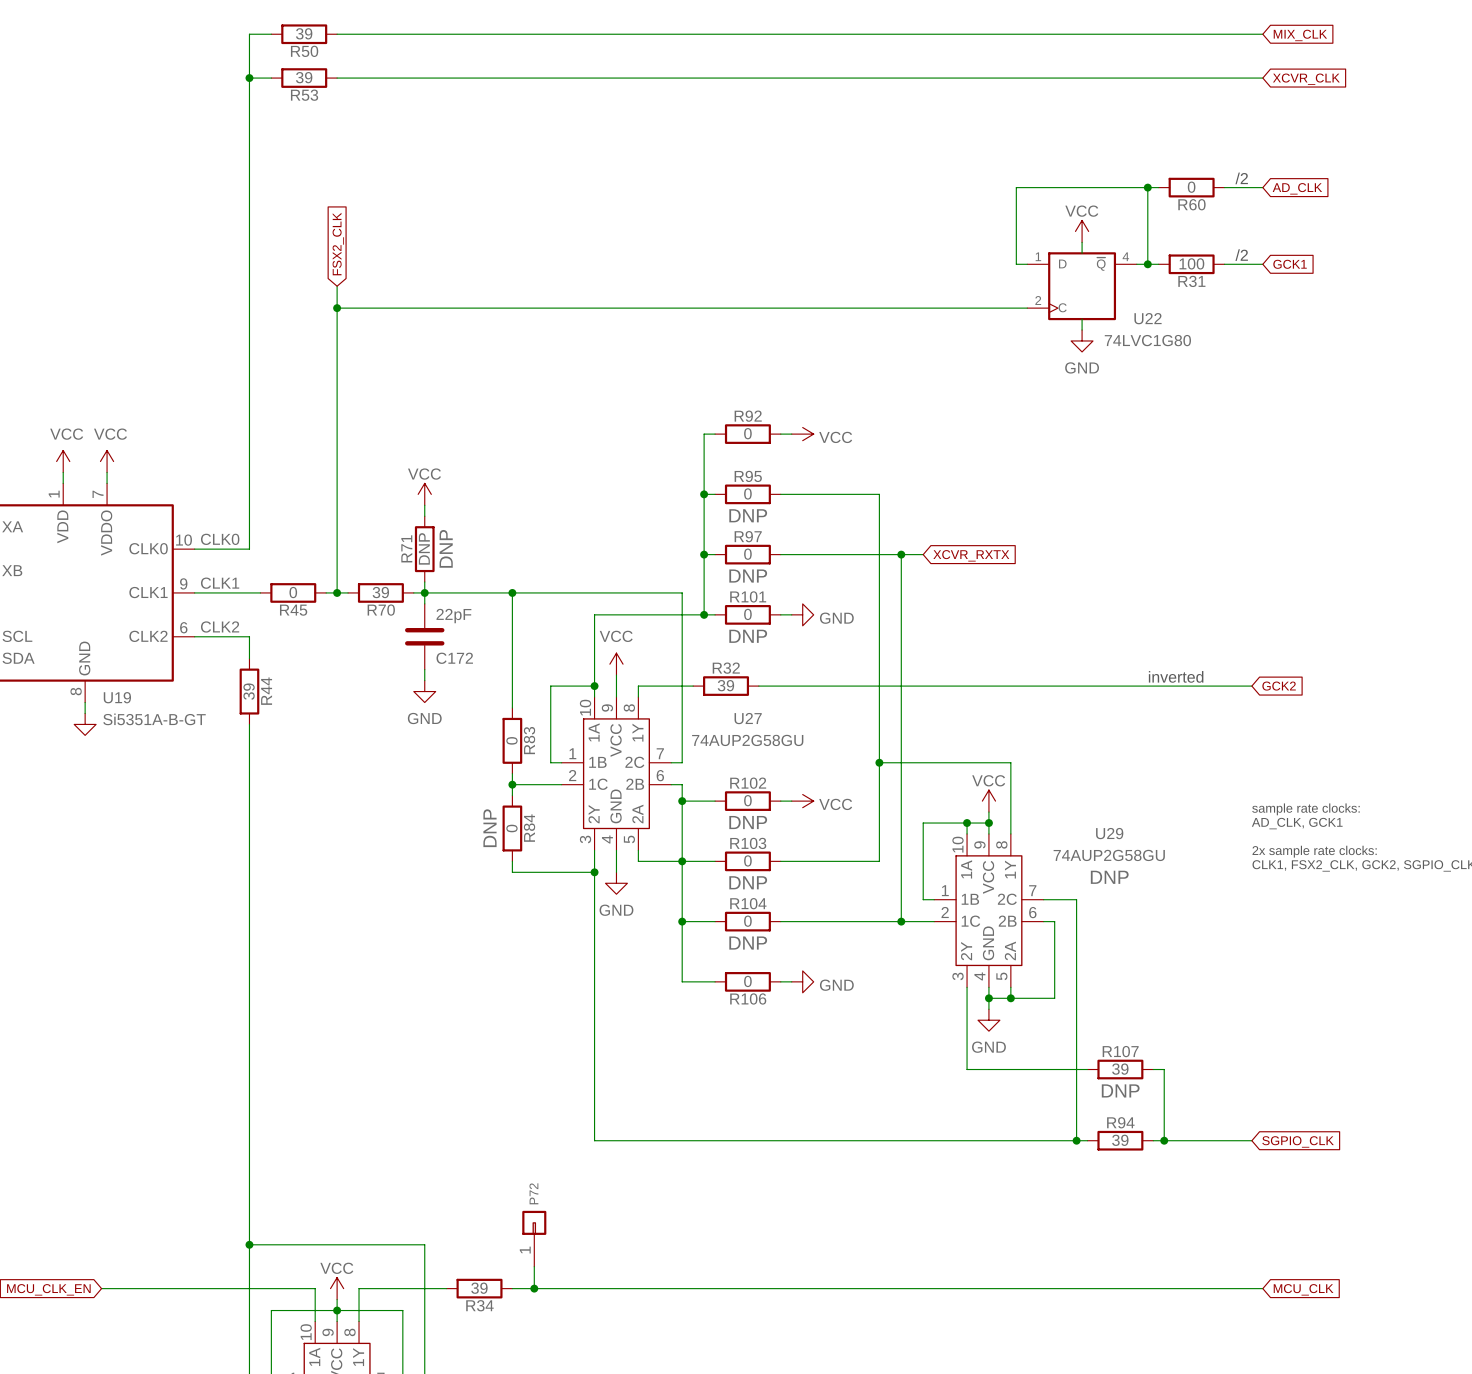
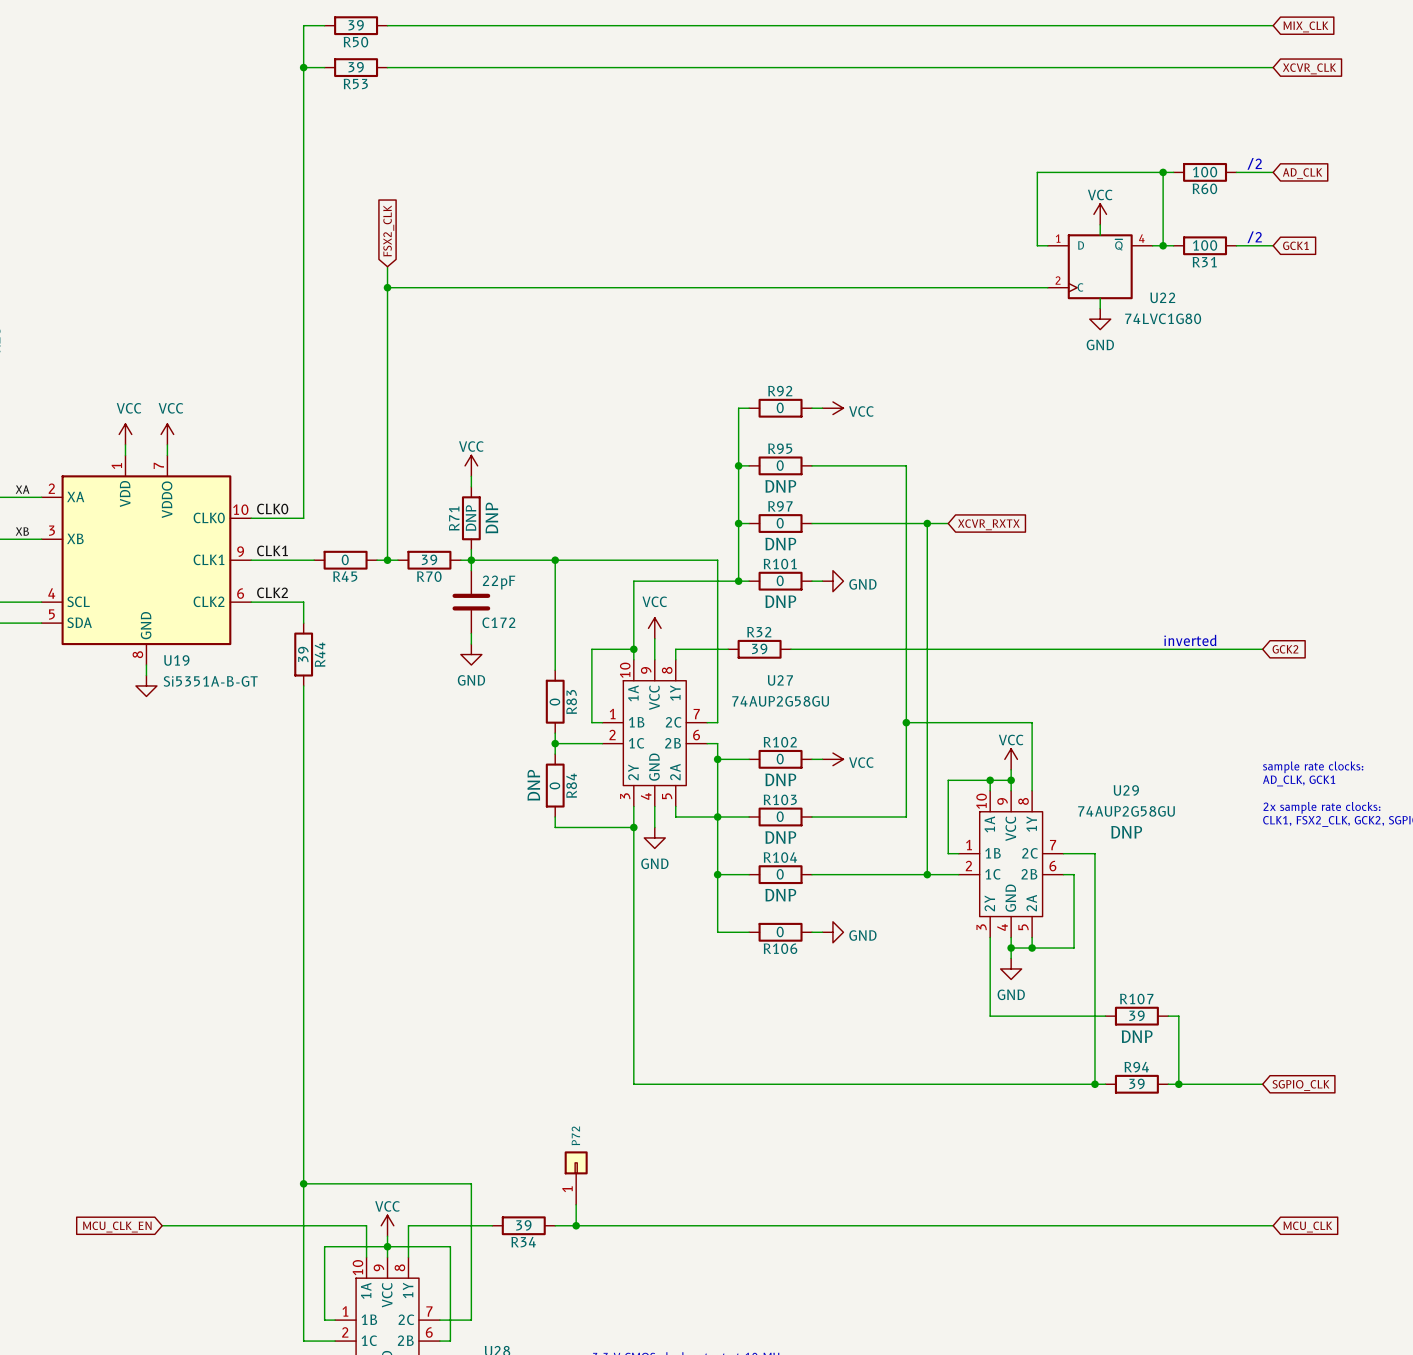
R60 value: 0 (1191, 187) -> 100 (1205, 172)

